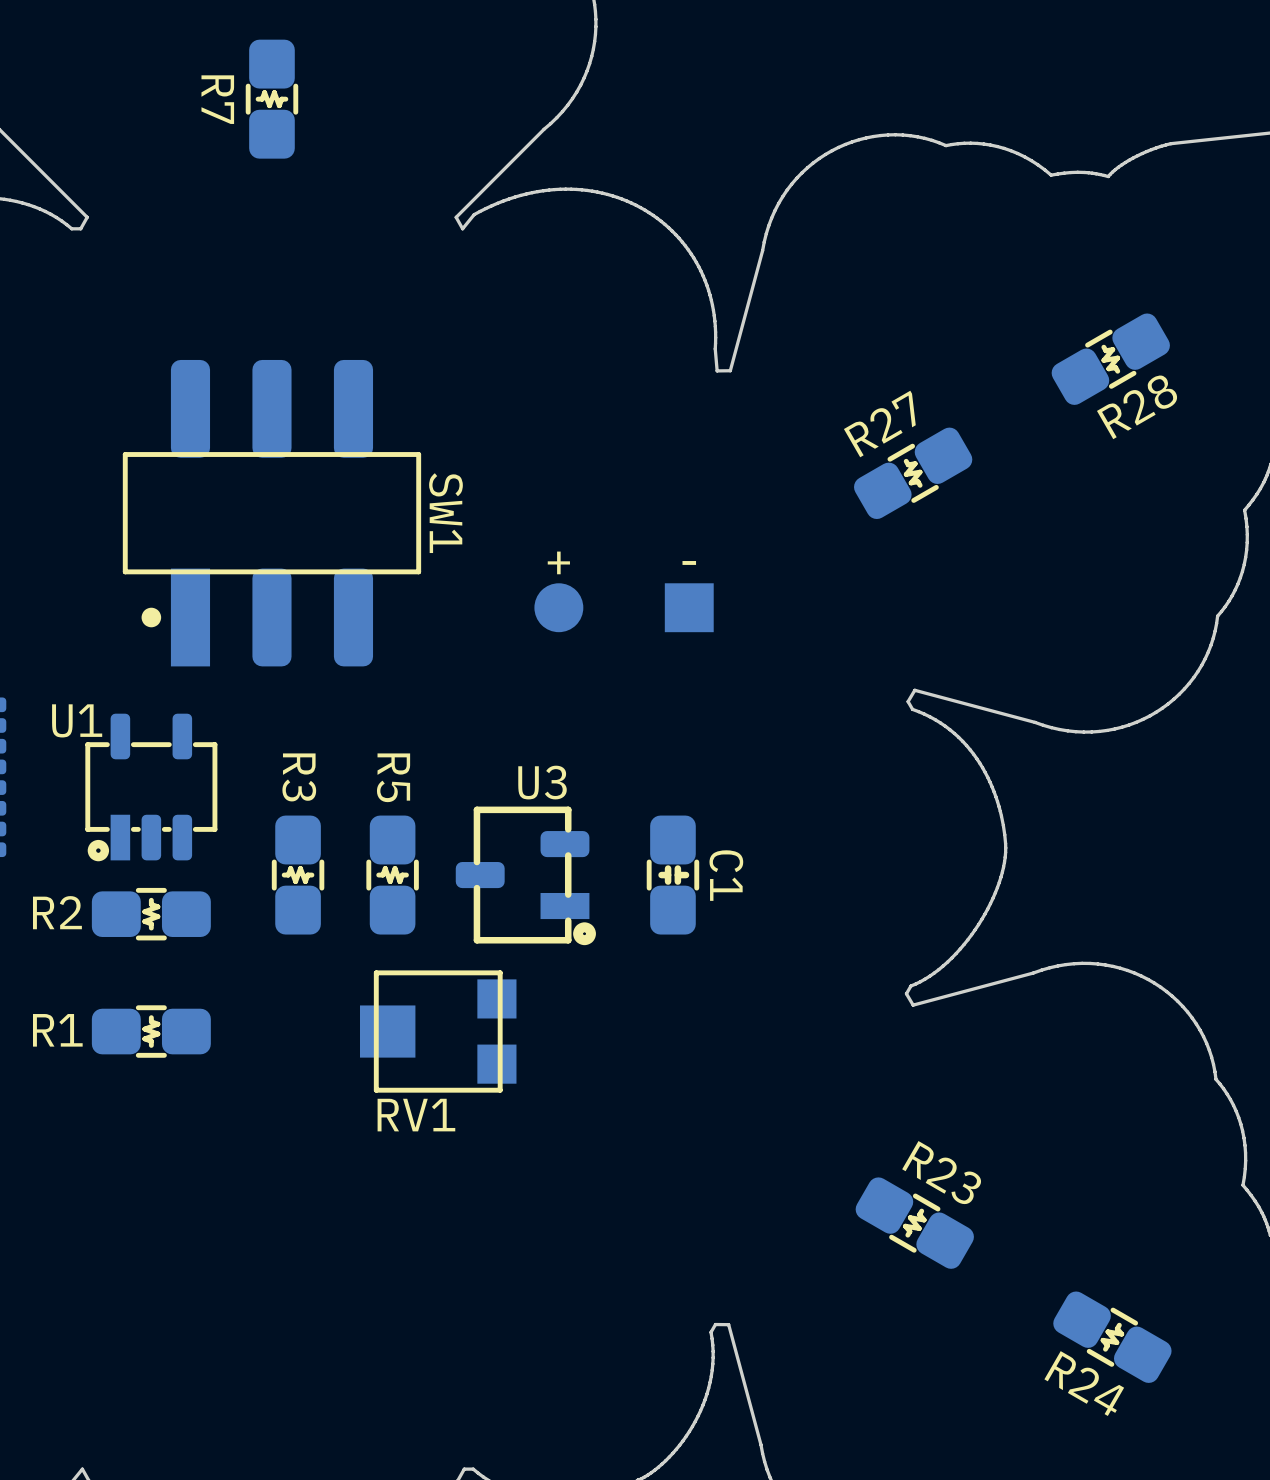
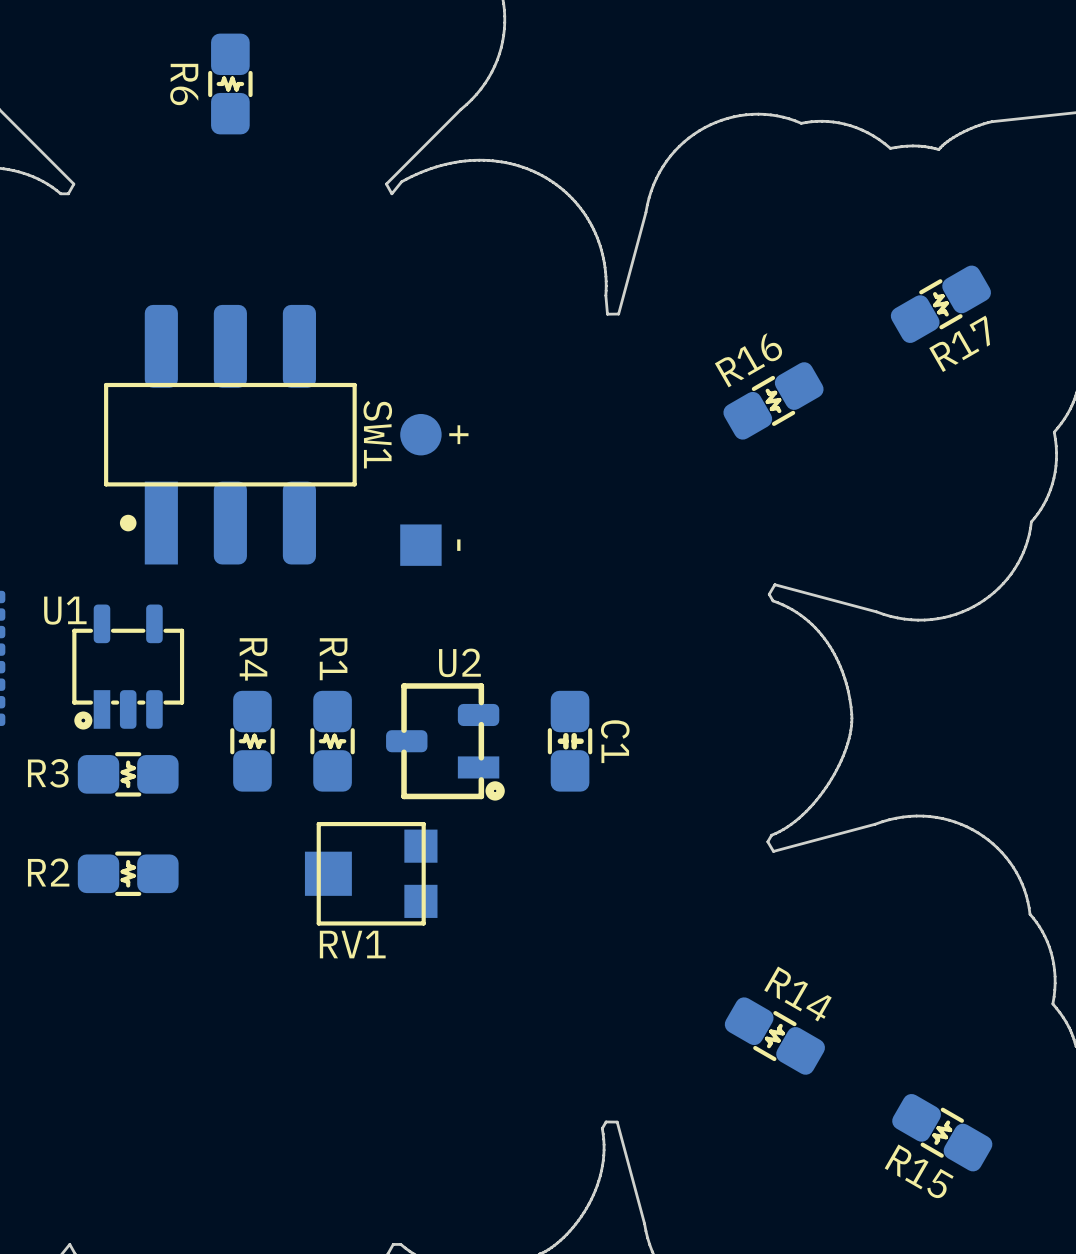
R7 name: R7 (217, 99) -> R6 (184, 84)
R28 name: R28 (1137, 407) -> R17 (959, 343)
R27 name: R27 (879, 424) -> R16 (748, 360)
part rotation: 0° (624, 607) -> 90° clockwise (420, 489)
part position: (624, 607) -> (420, 489)
R3 name: R3 (299, 777) -> R4 (253, 659)
R5 name: R5 (393, 777) -> R1 (333, 659)
U3 name: U3 (542, 782) -> U2 (459, 662)
R2 name: R2 (57, 912) -> R3 (48, 773)
R1 name: R1 (57, 1030) -> R2 (48, 872)
R23 name: R23 (941, 1172) -> R14 (797, 993)
R24 name: R24 (1084, 1383) -> R15 (919, 1171)

